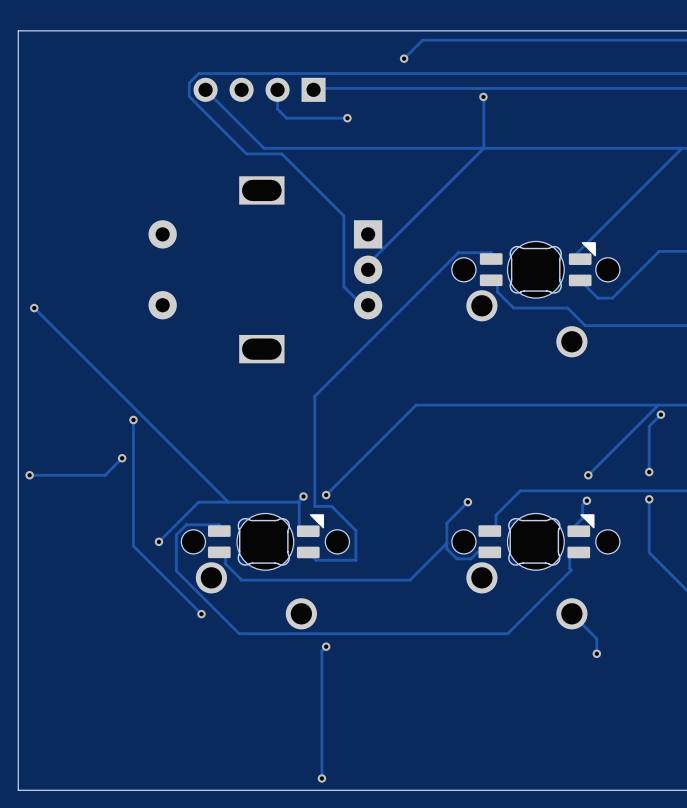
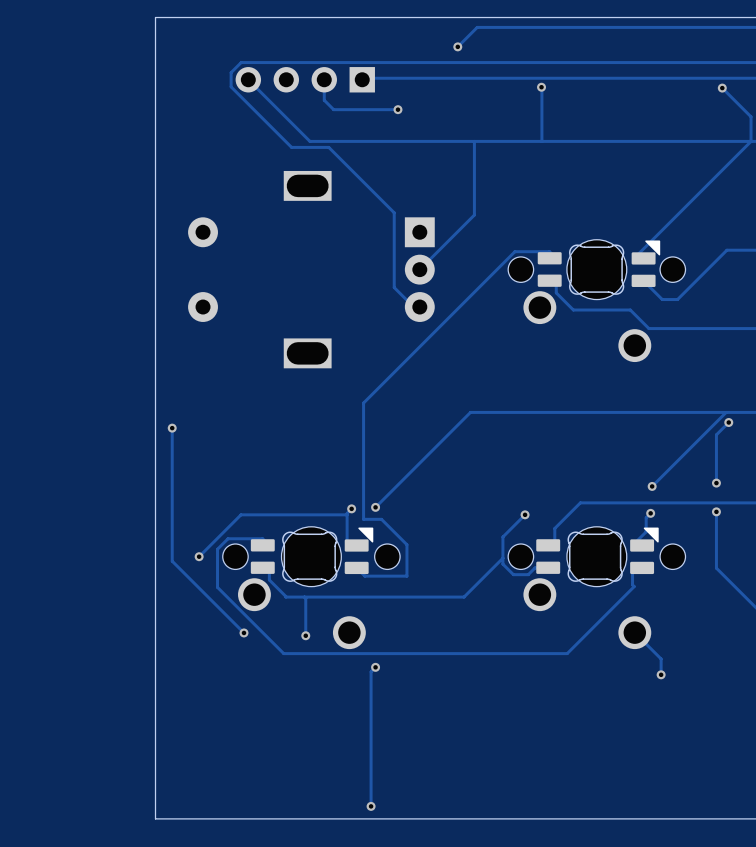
board edge: (117, 30) (18, 30) (18, 790) (117, 790) -> (155, 17) (155, 818)
track: none -> (722, 88) (751, 116) (751, 141)
via: none -> (722, 88)
track: none -> (474, 141) (474, 215) (419, 269)
track: (483, 148) (362, 269) -> none
track: (34, 308) (228, 502) -> none
via: (34, 308) -> none
track: (122, 458) (105, 475) (29, 475) -> none
via: (122, 458) -> none
via: (29, 475) -> none
track: none -> (304, 597) (305, 635)
via: none -> (305, 635)

